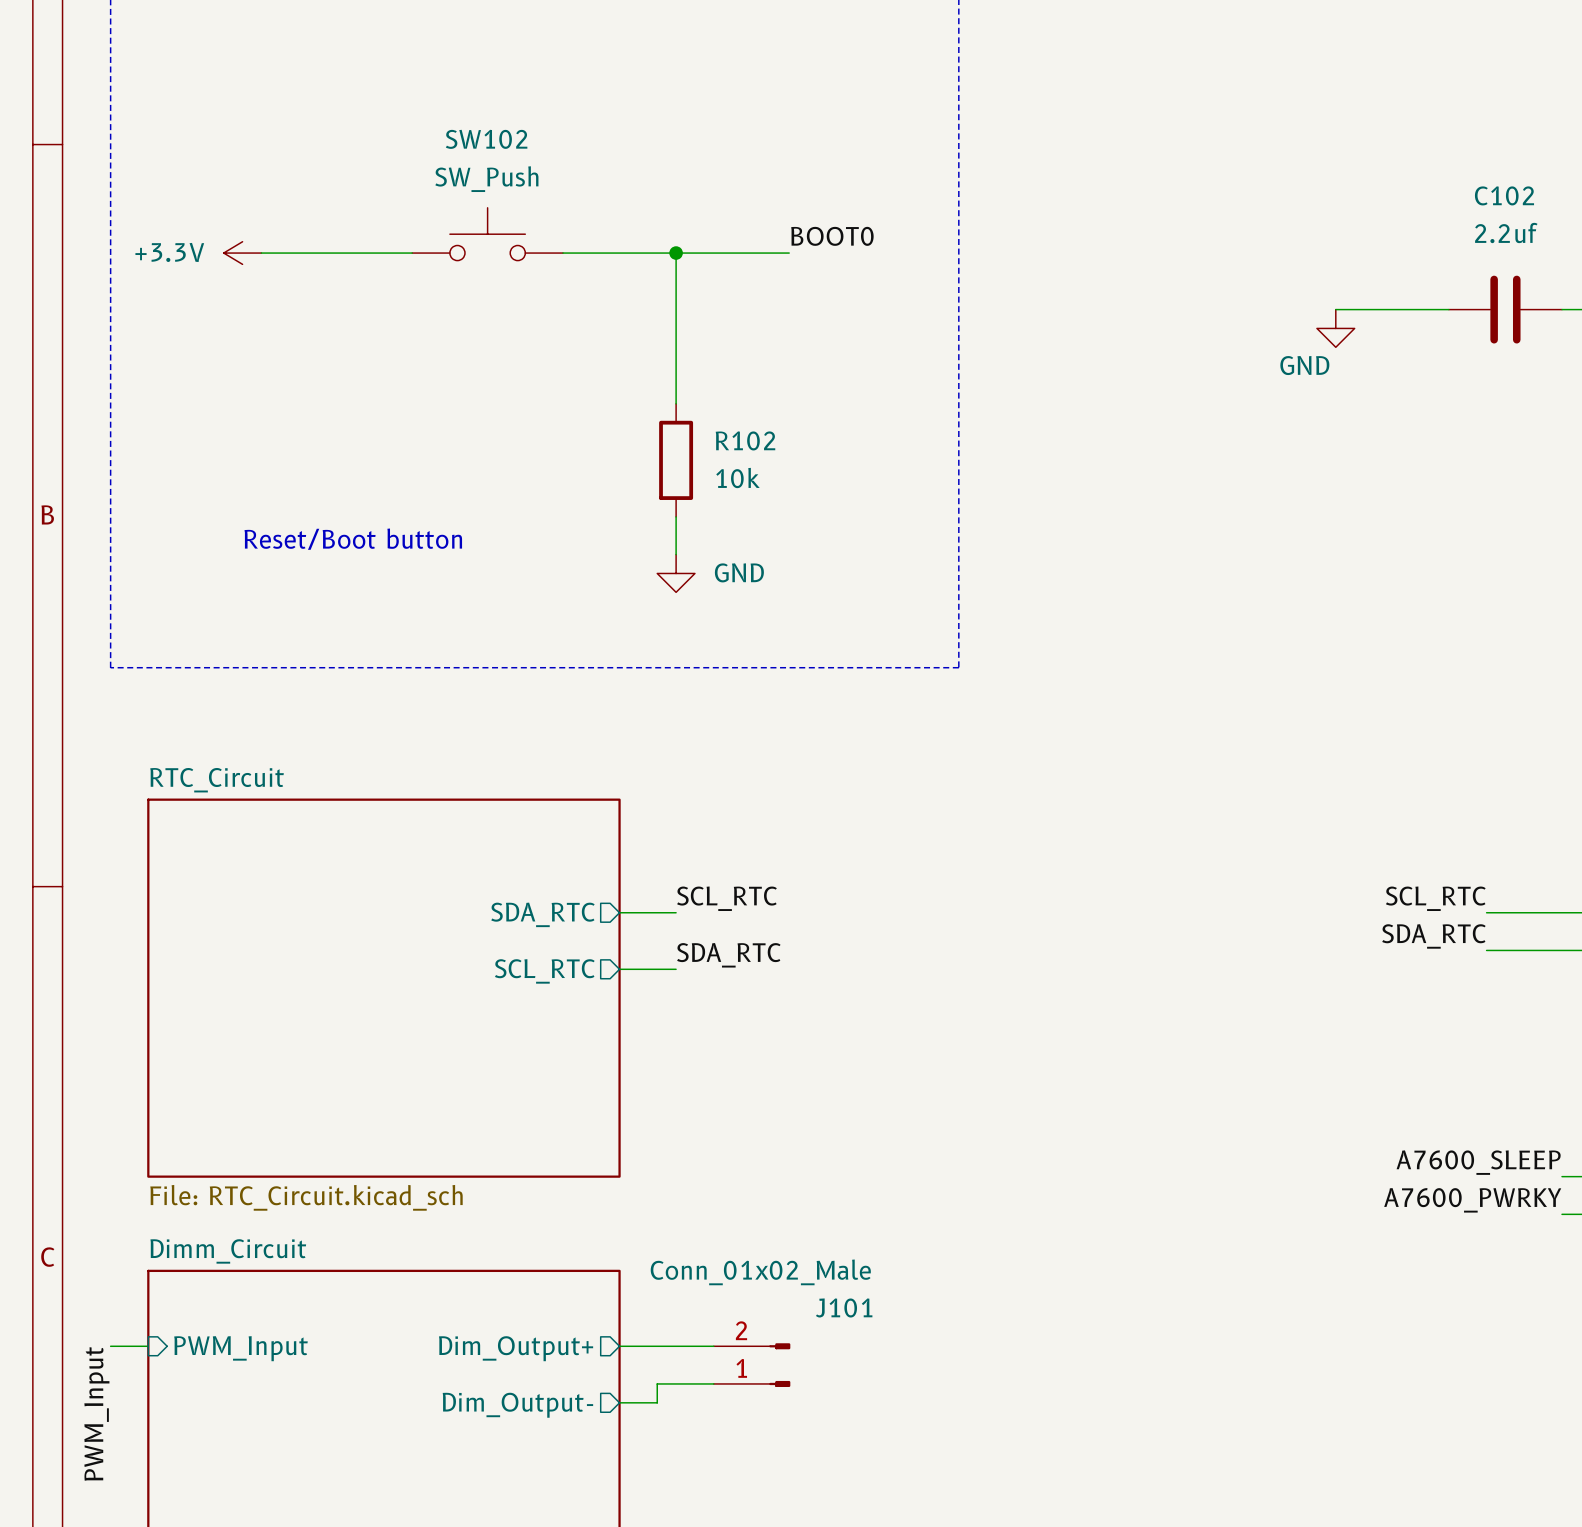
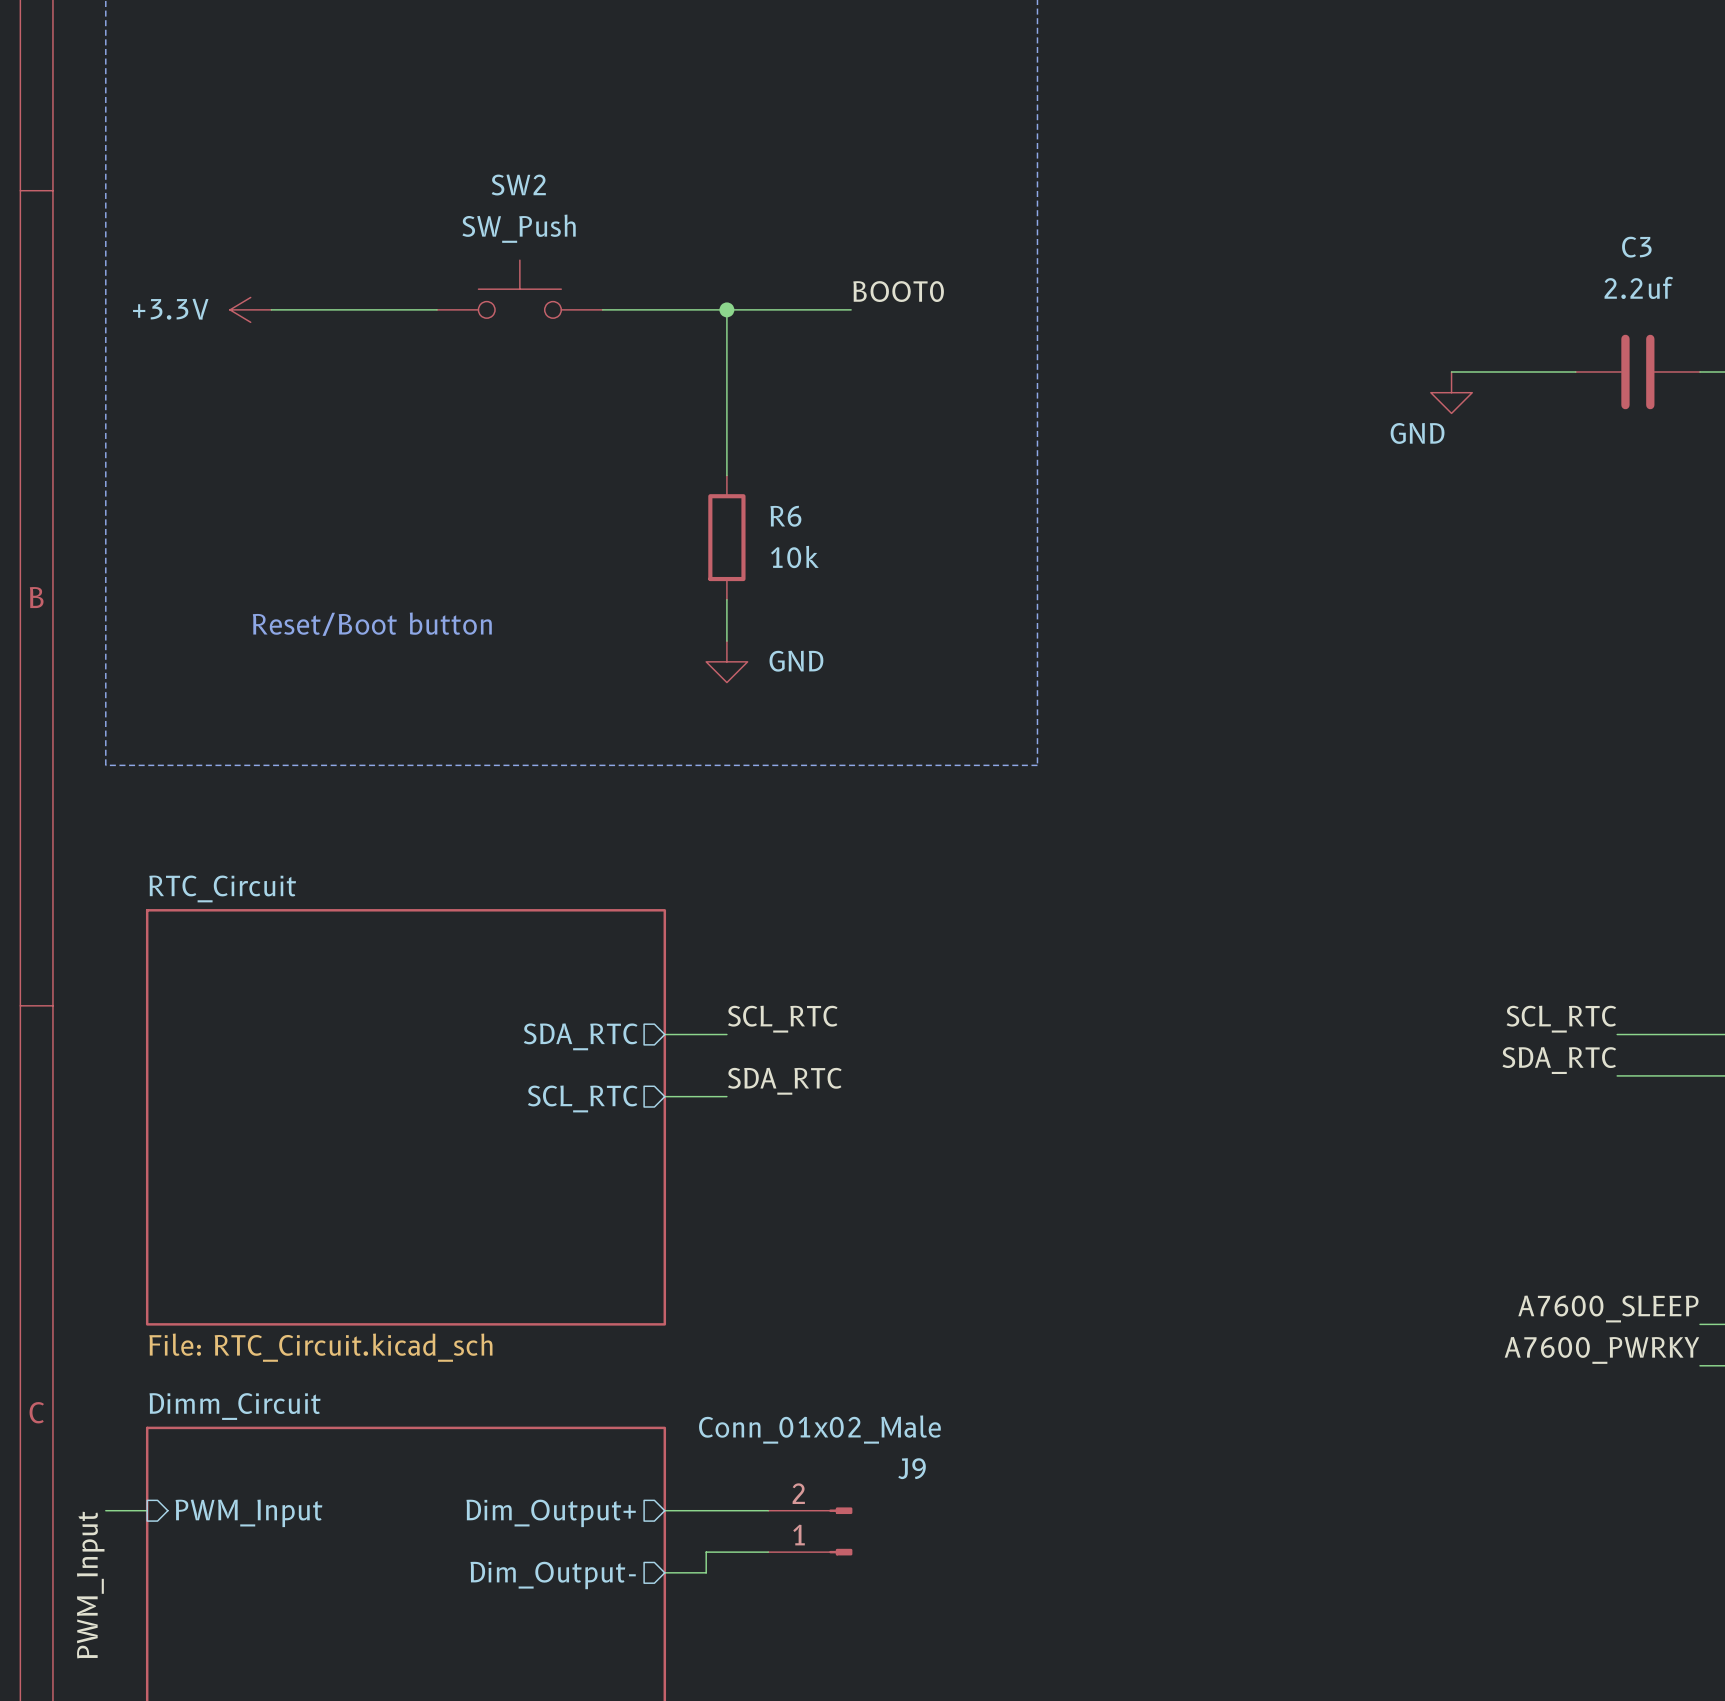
SW102 name: SW102 (486, 139) -> SW2 (518, 185)
C102 name: C102 (1504, 195) -> C3 (1636, 247)
R102 name: R102 (745, 440) -> R6 (785, 516)
J101 name: J101 (844, 1307) -> J9 (912, 1468)

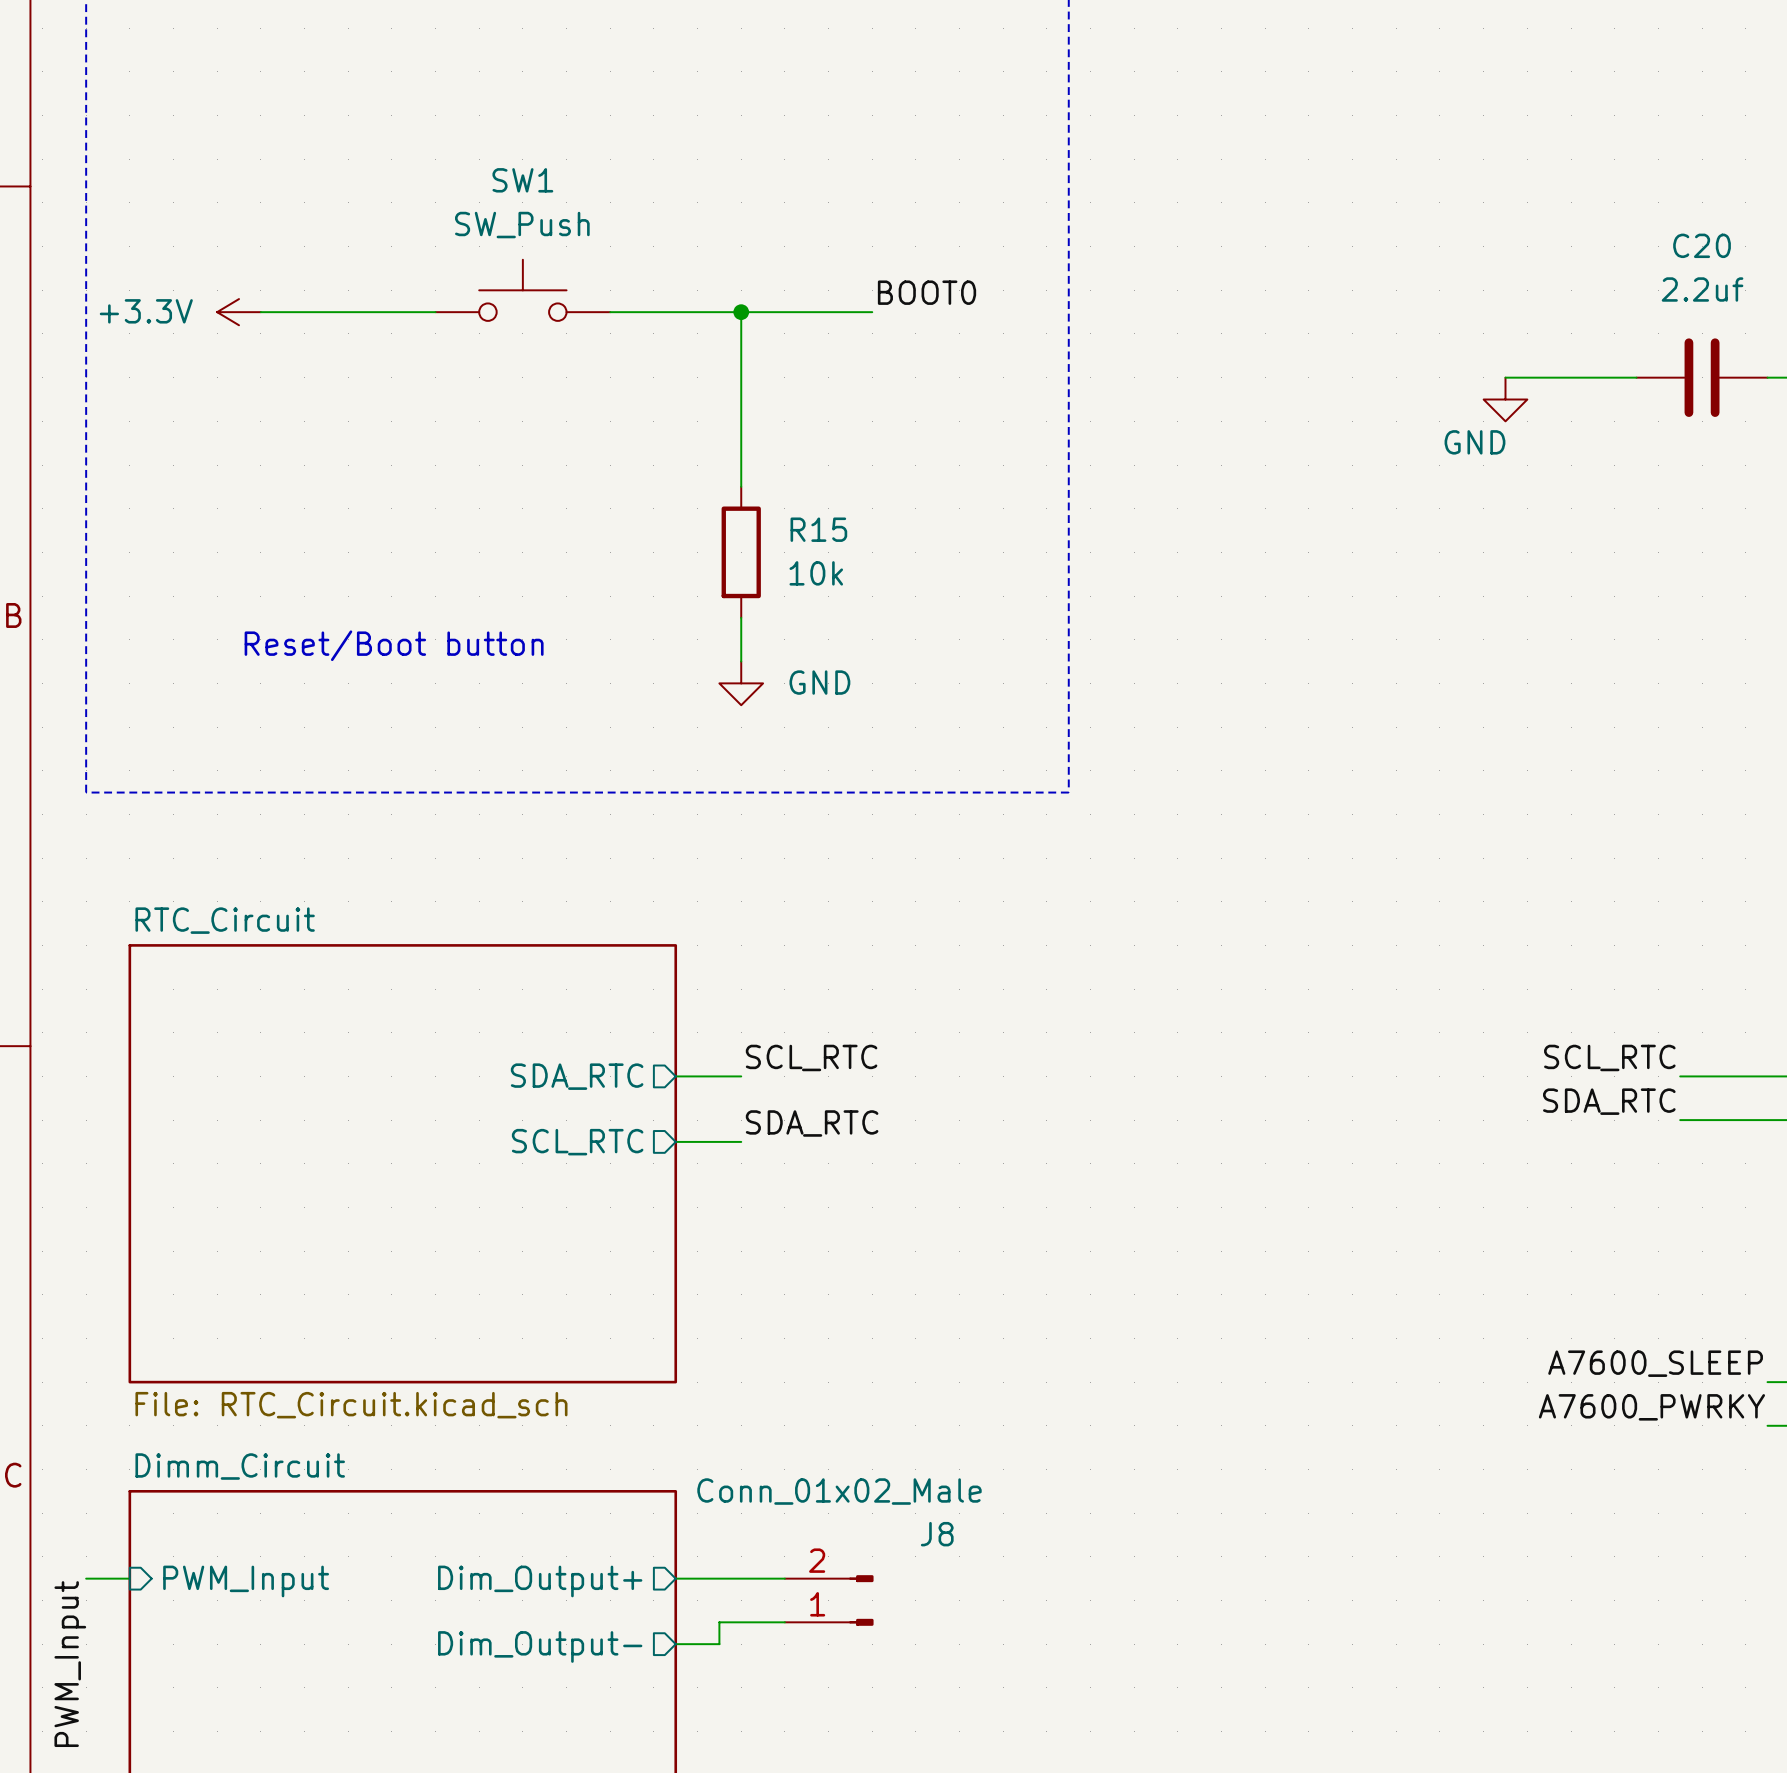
SW2 name: SW2 (518, 185) -> SW1 (522, 180)
C3 name: C3 (1636, 247) -> C20 (1702, 245)
R6 name: R6 (785, 516) -> R15 (818, 529)
J9 name: J9 (912, 1468) -> J8 (937, 1534)

